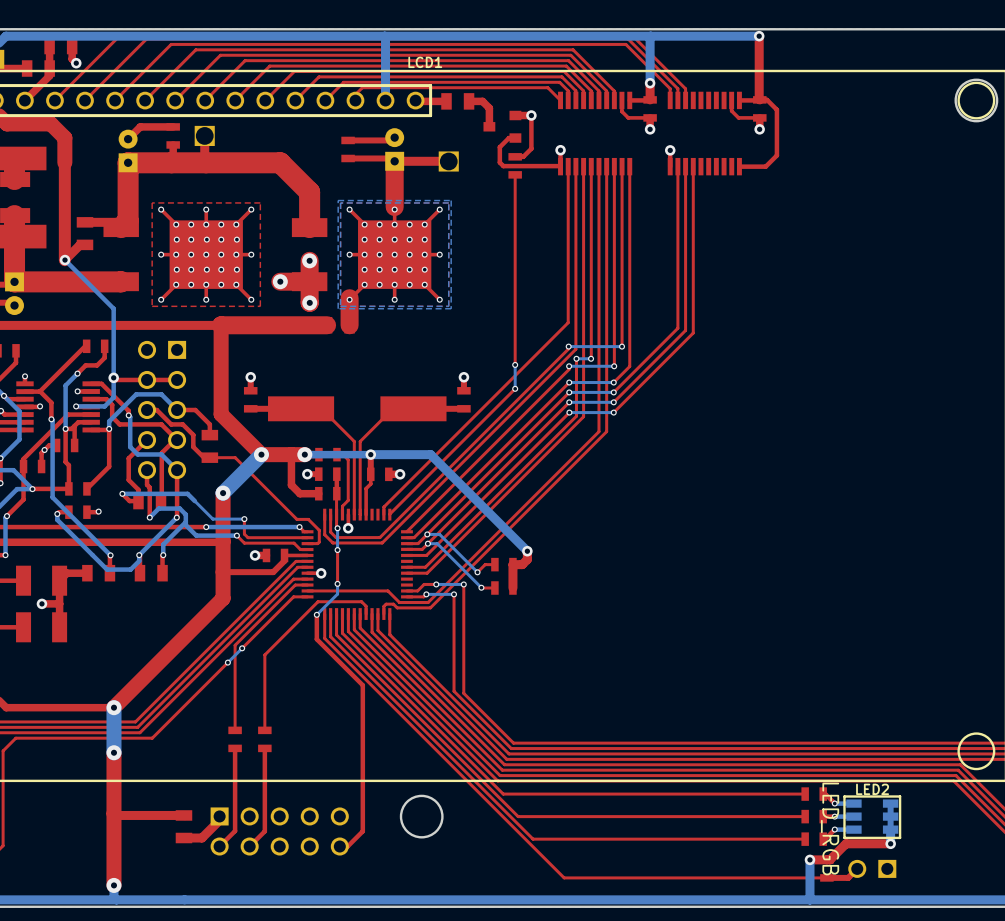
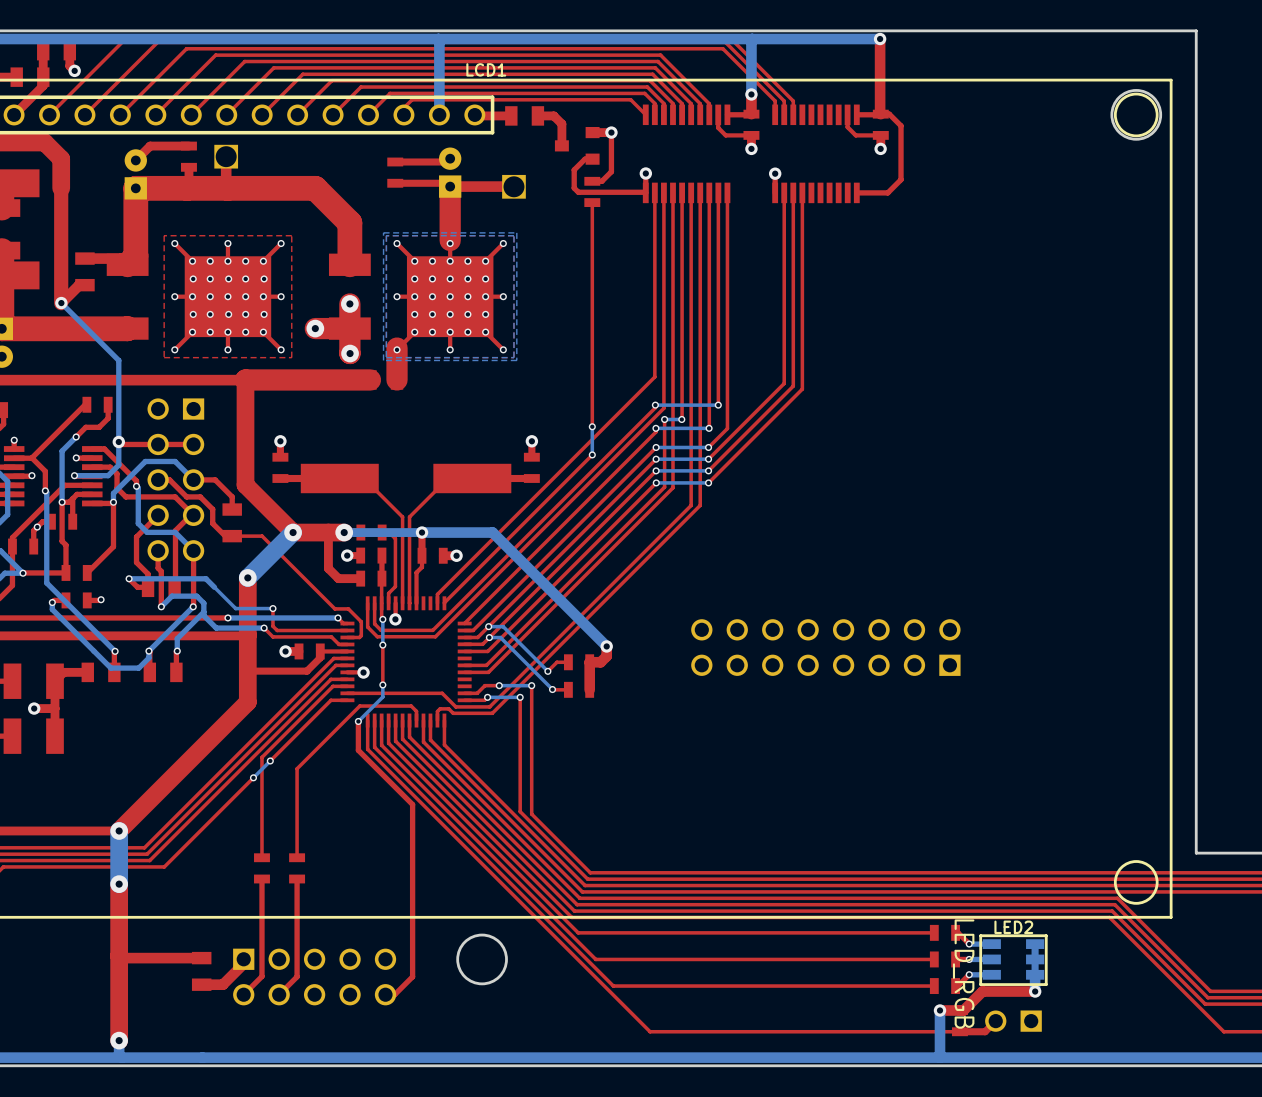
part: none -> (825, 647)

